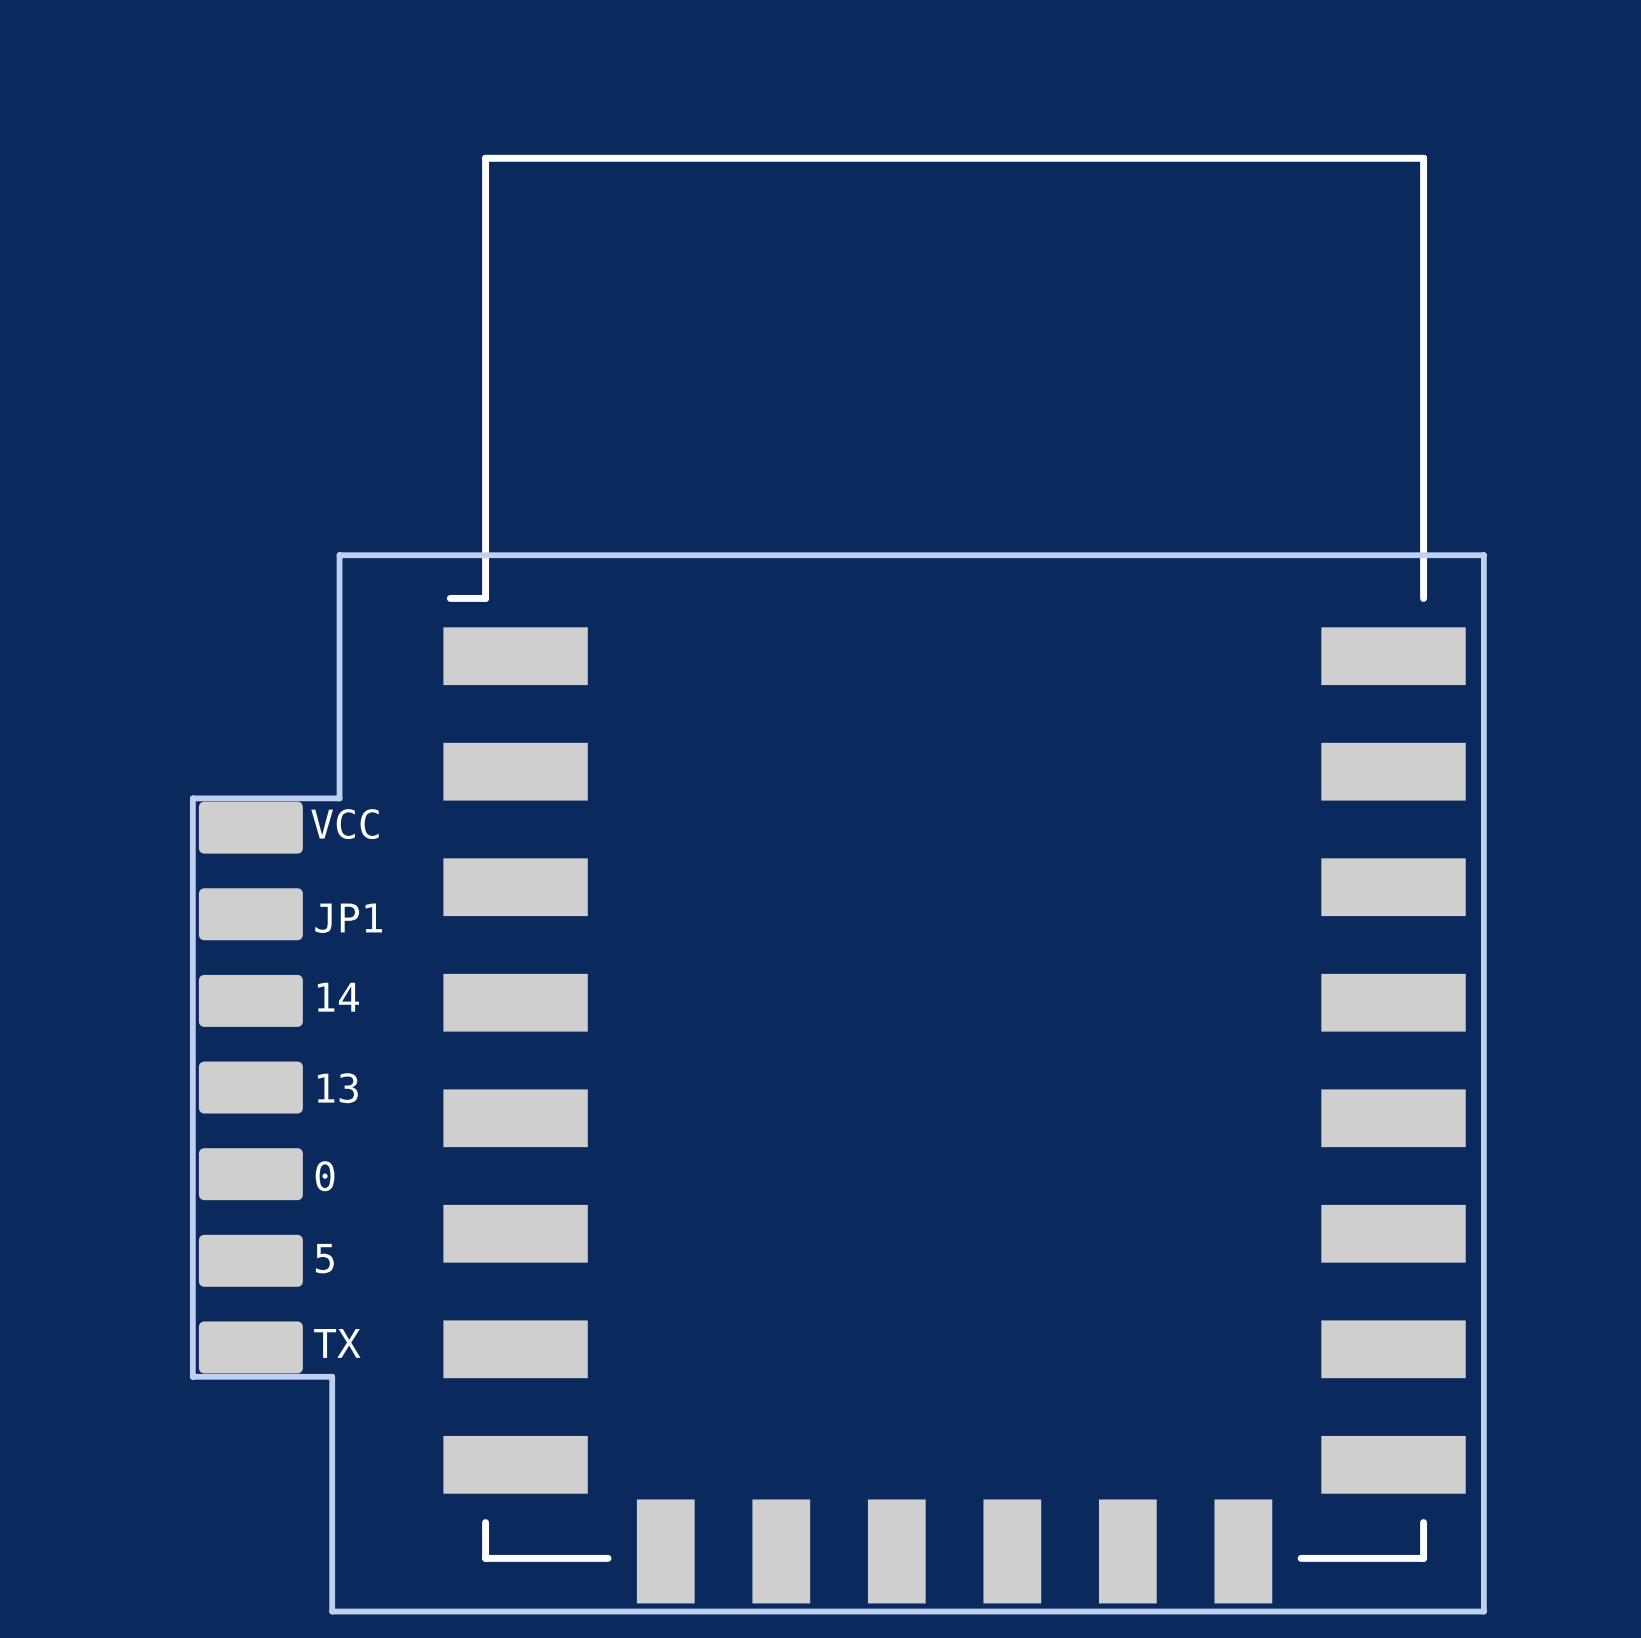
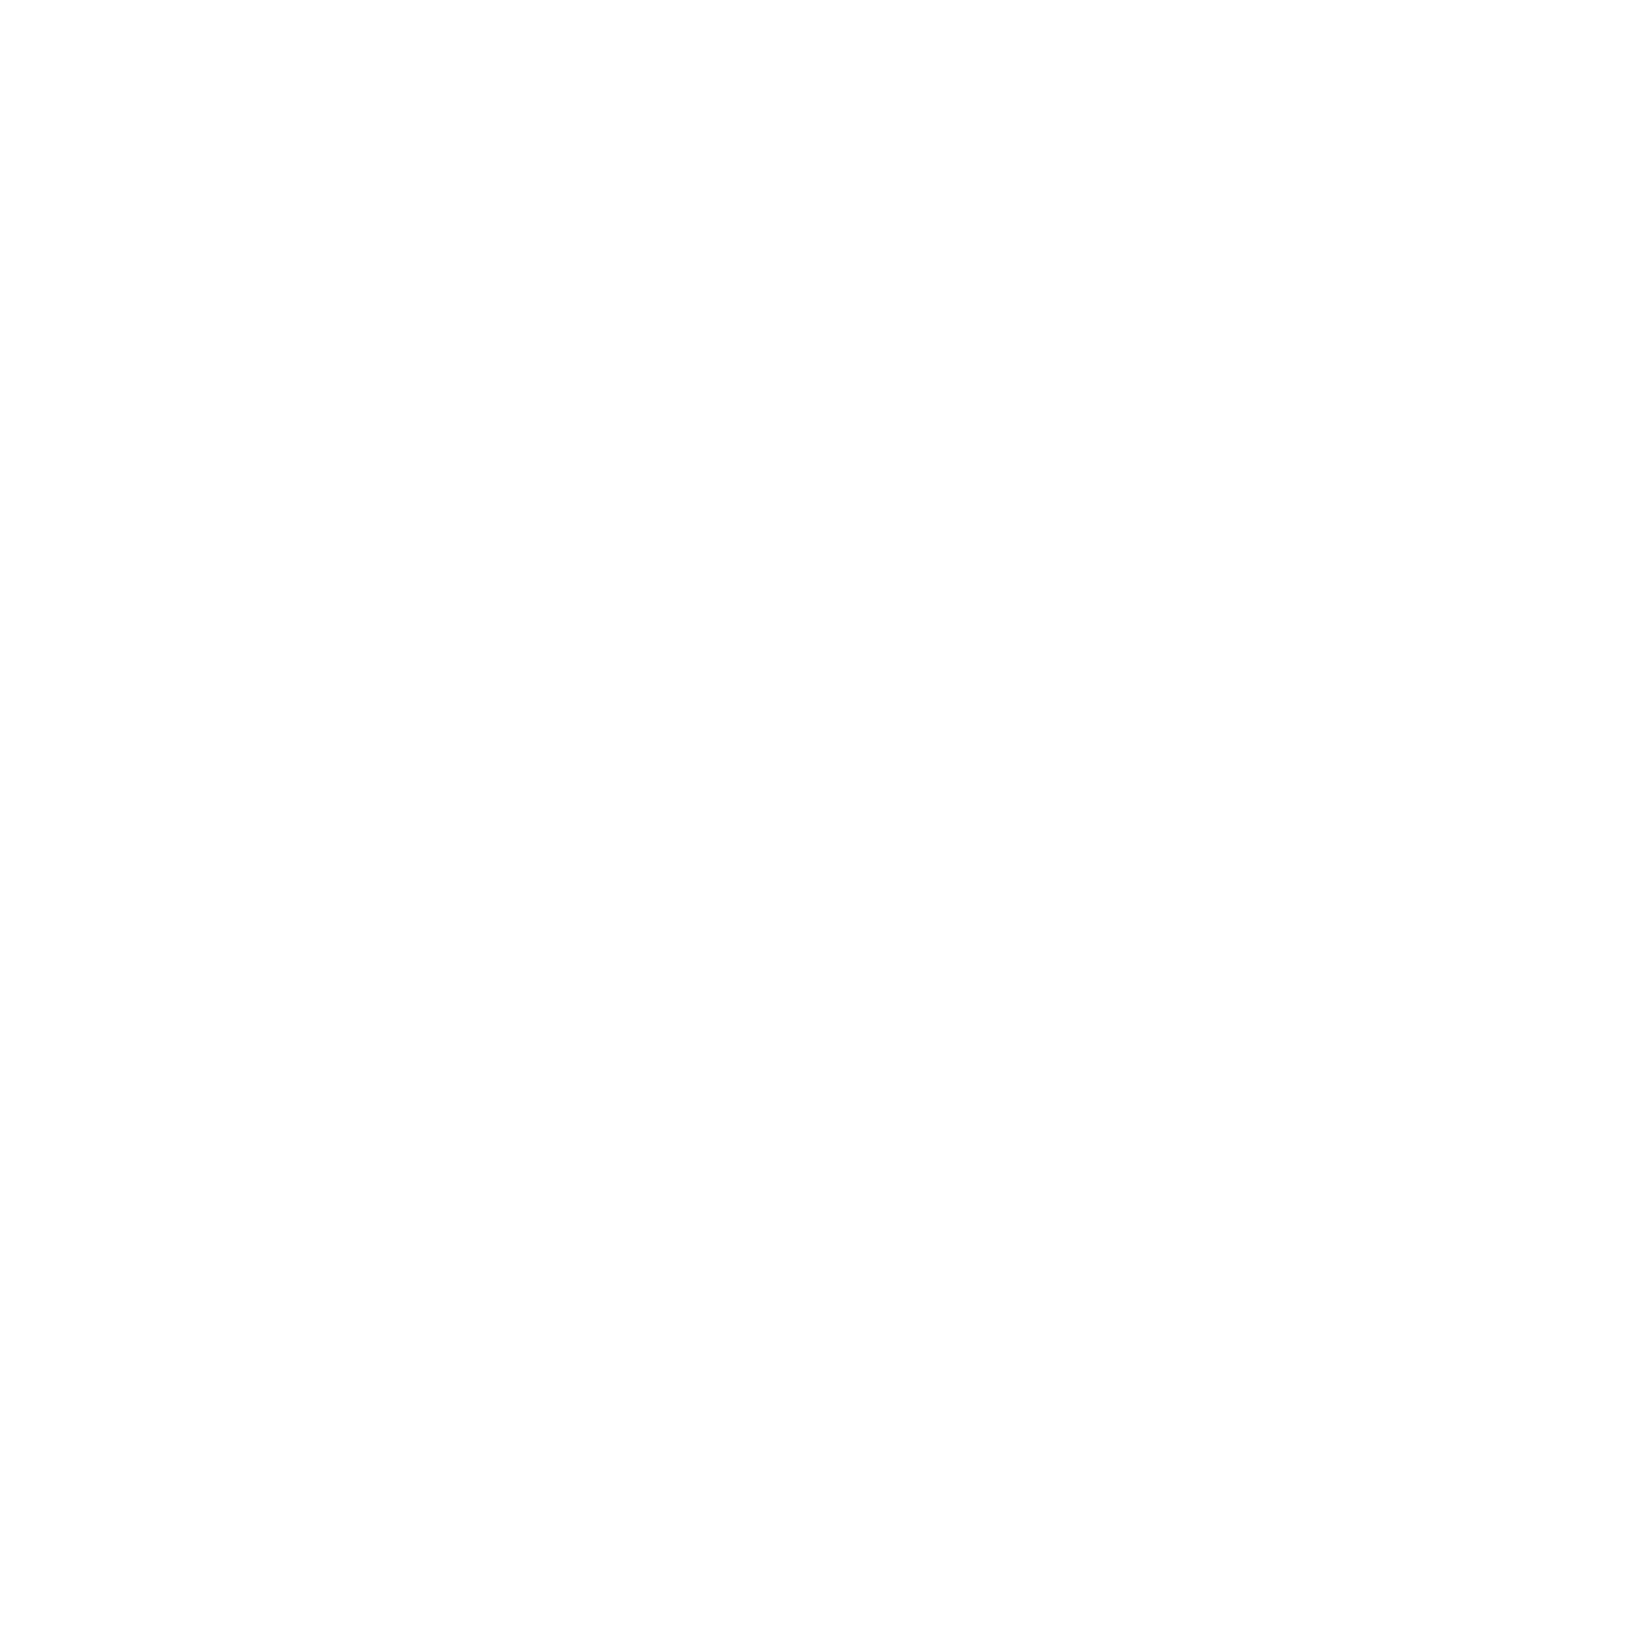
board edge: (339, 555) (339, 798) (192, 798) (192, 1376) (332, 1376) (332, 1611) (1483, 1611) (1483, 555) (339, 555) -> none
text: VCC (344, 824) -> none
part: (954, 879) -> none
text: JP1 (348, 918) -> none
text: 14 (338, 997) -> none
part: (250, 1087) -> none
text: 13 (337, 1088) -> none
text: 0 (325, 1176) -> none
text: 5 (324, 1258) -> none
text: TX (337, 1343) -> none

